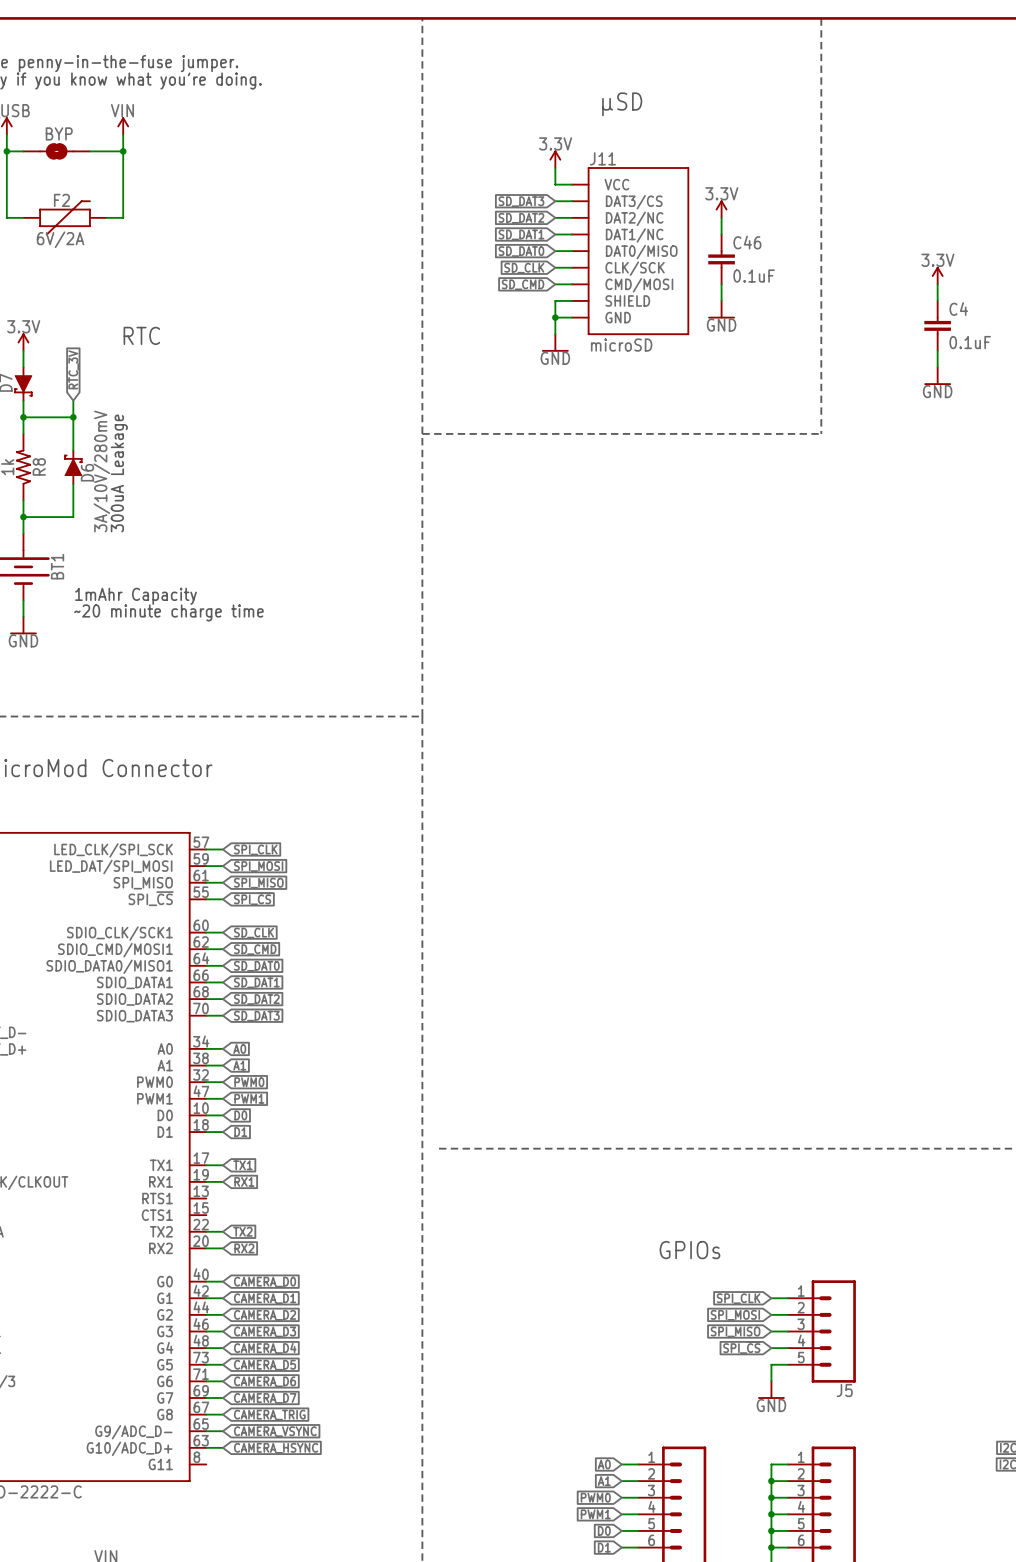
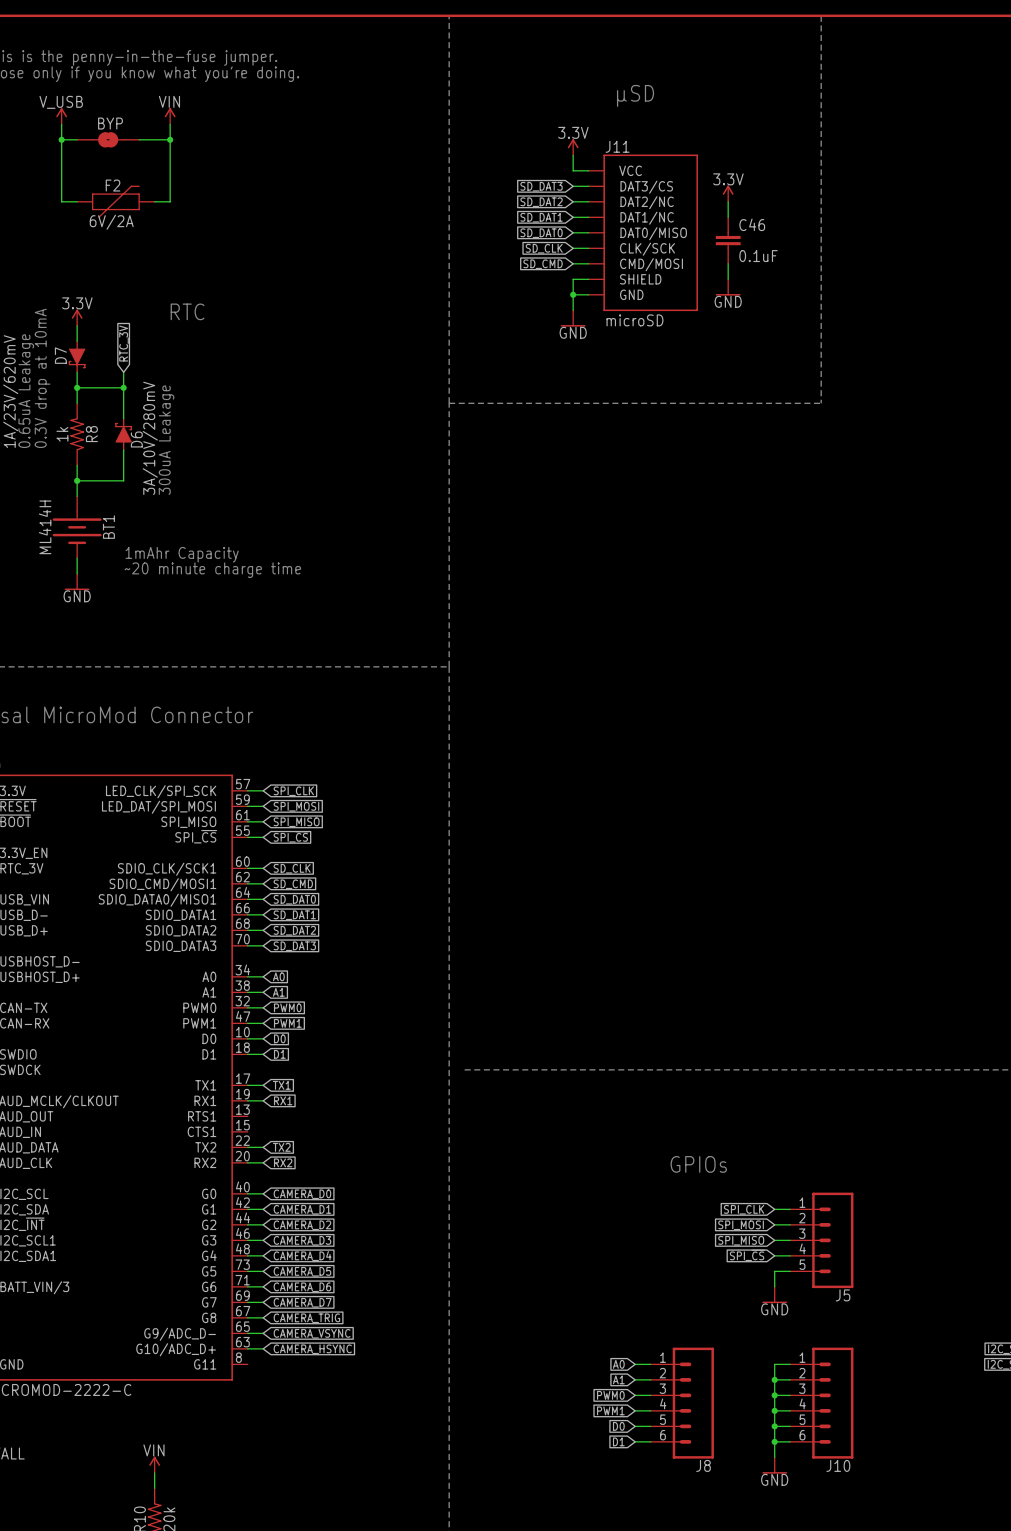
power symbol: 3.3V (937, 275) -> none
wire: (937, 284) (937, 300) -> none
C4: 0.1uF (937, 325) -> none
wire: (937, 350) (937, 367) -> none
power symbol: GND (937, 376) -> none

